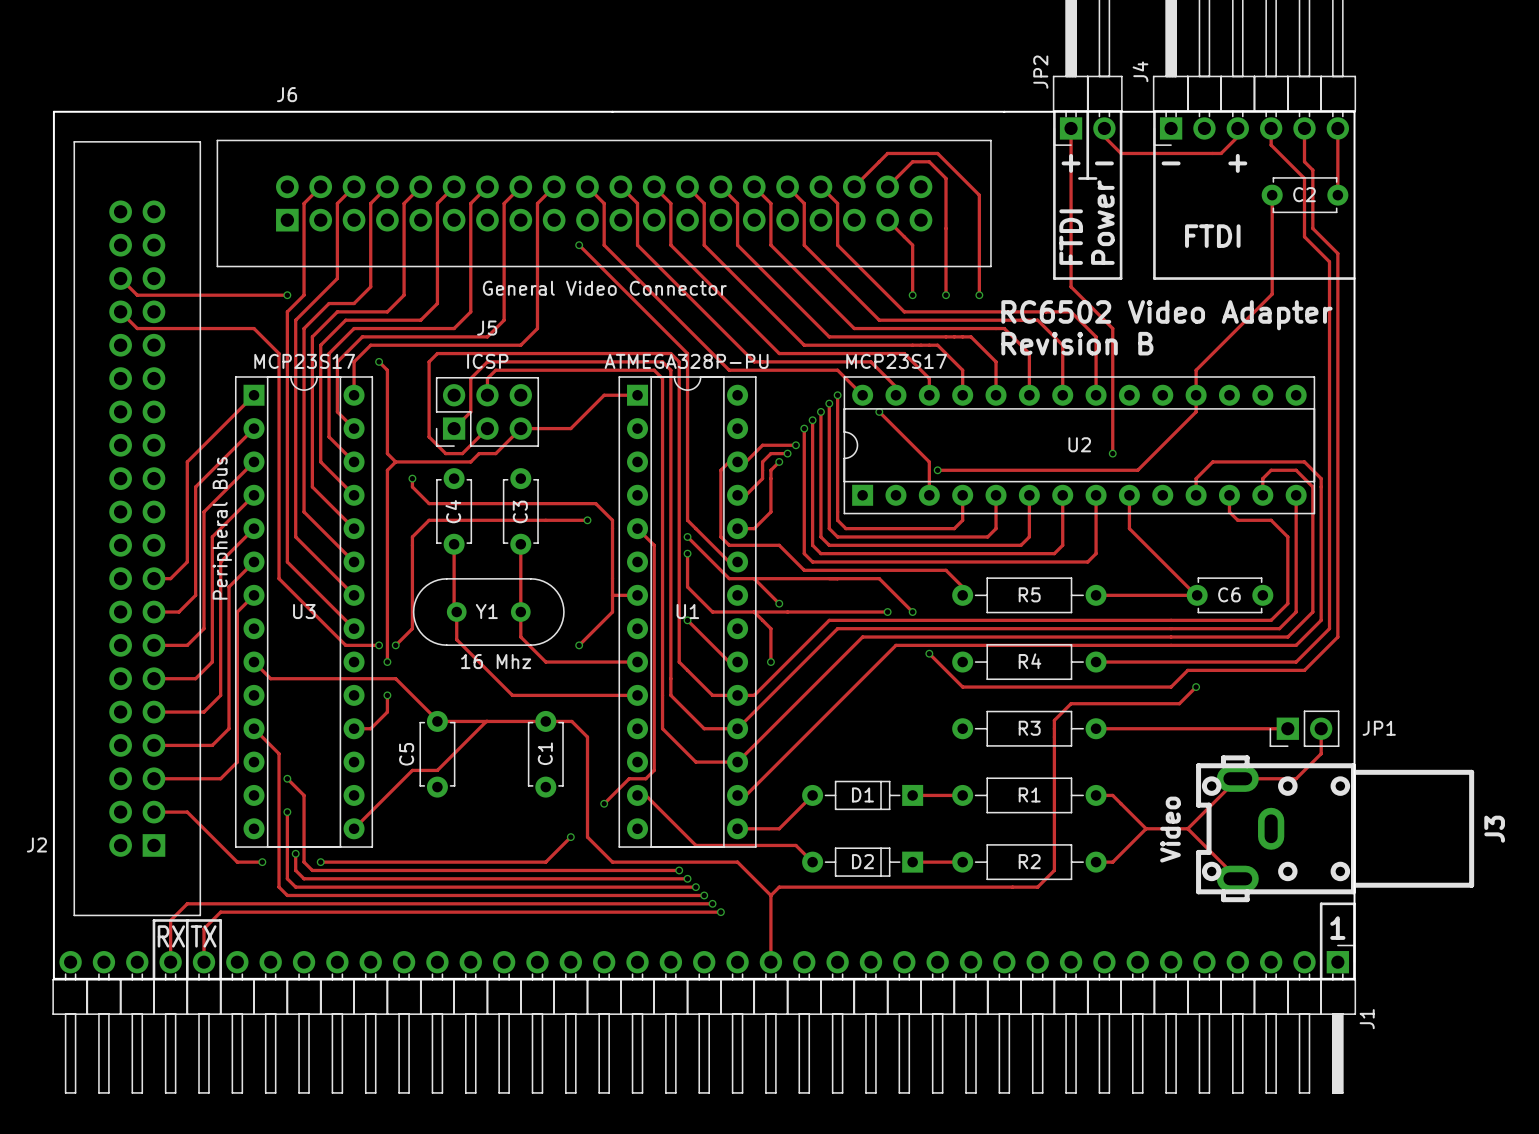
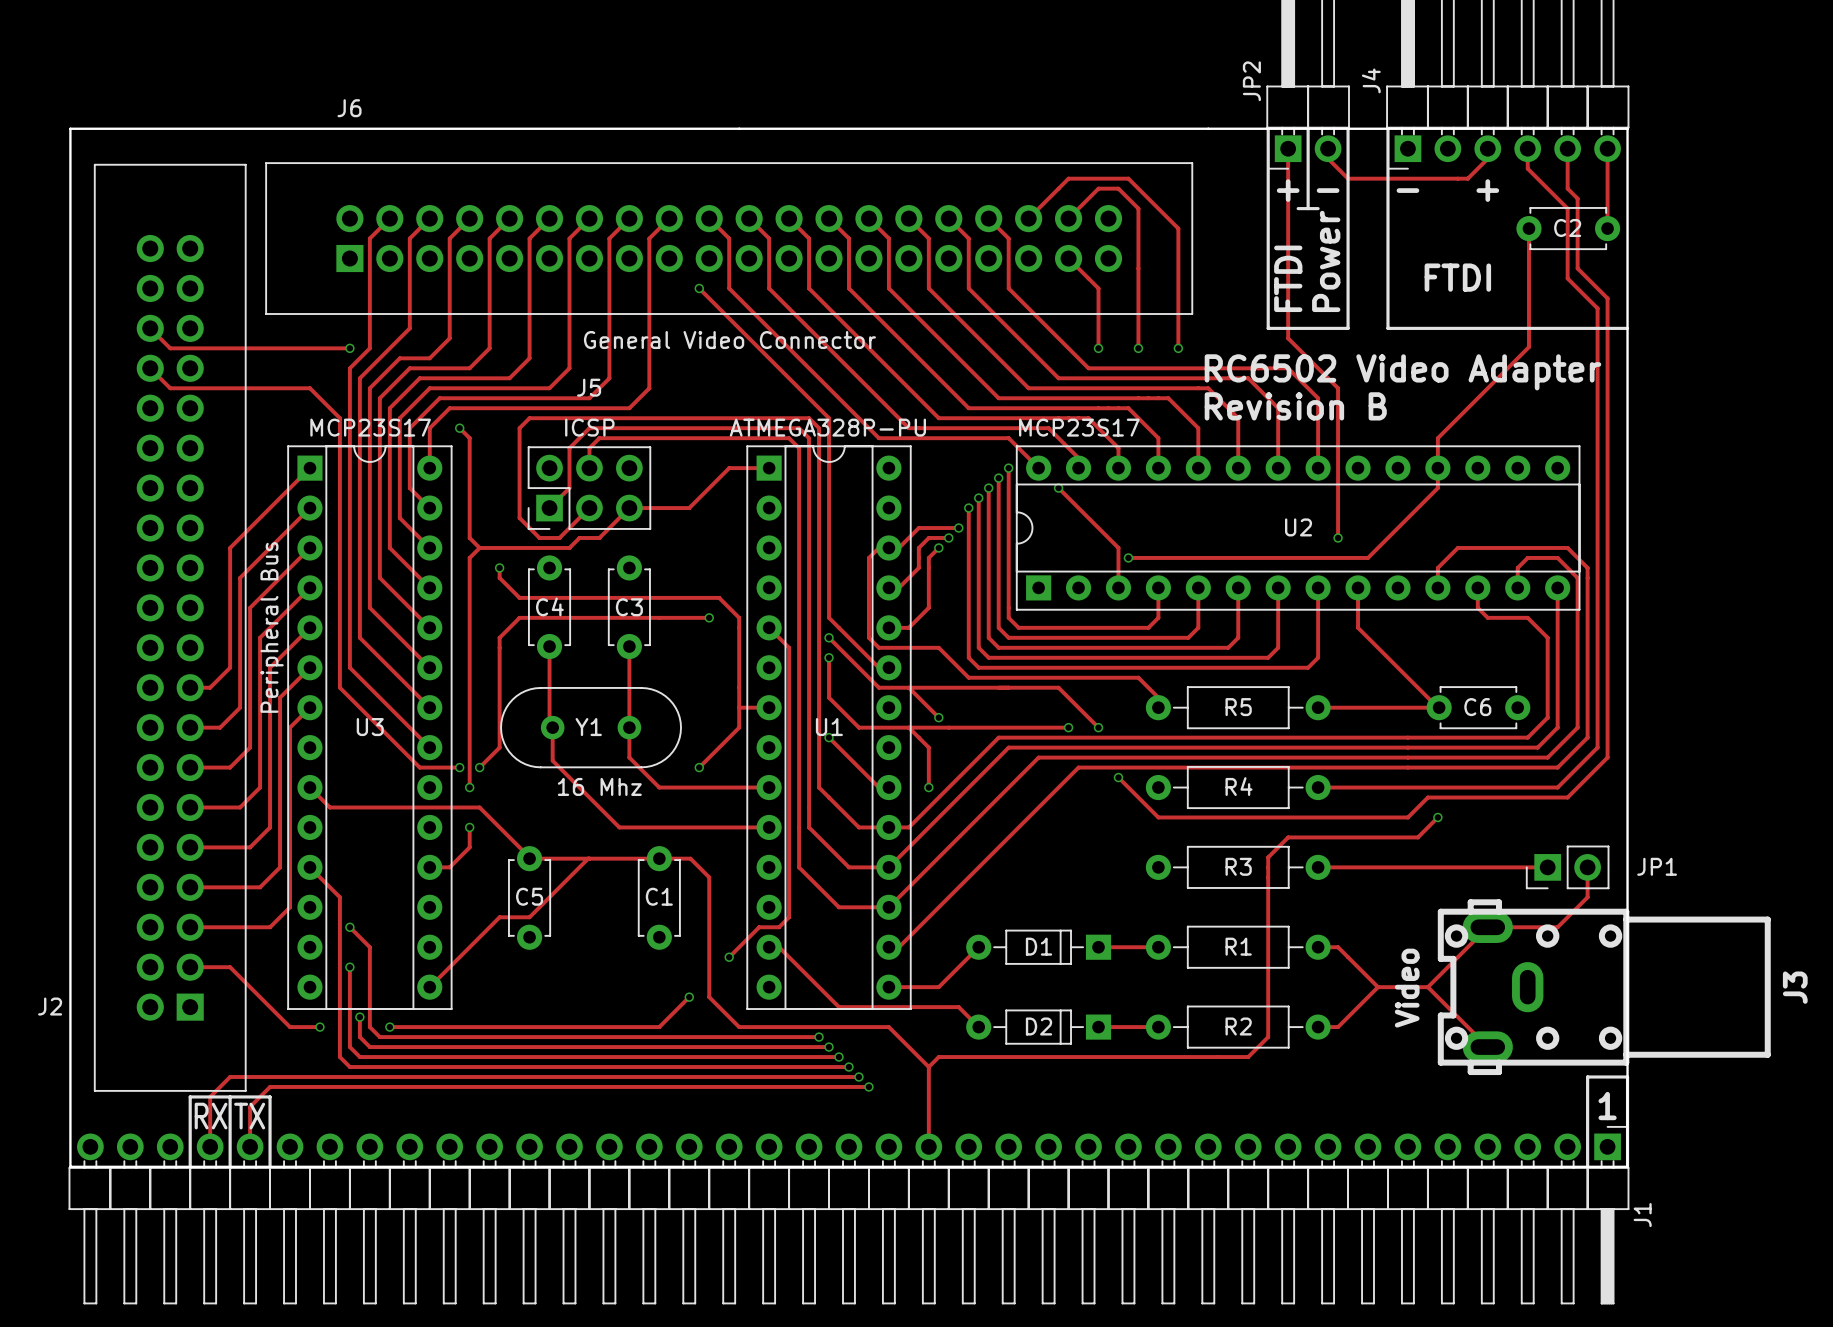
C4 name rotation: 0° (453, 511) -> 90° clockwise (549, 606)
C3 name rotation: 0° (520, 511) -> 90° clockwise (629, 607)
C1 name rotation: 0° (545, 753) -> 90° clockwise (659, 896)
C5 name rotation: 0° (406, 754) -> 90° clockwise (529, 896)

